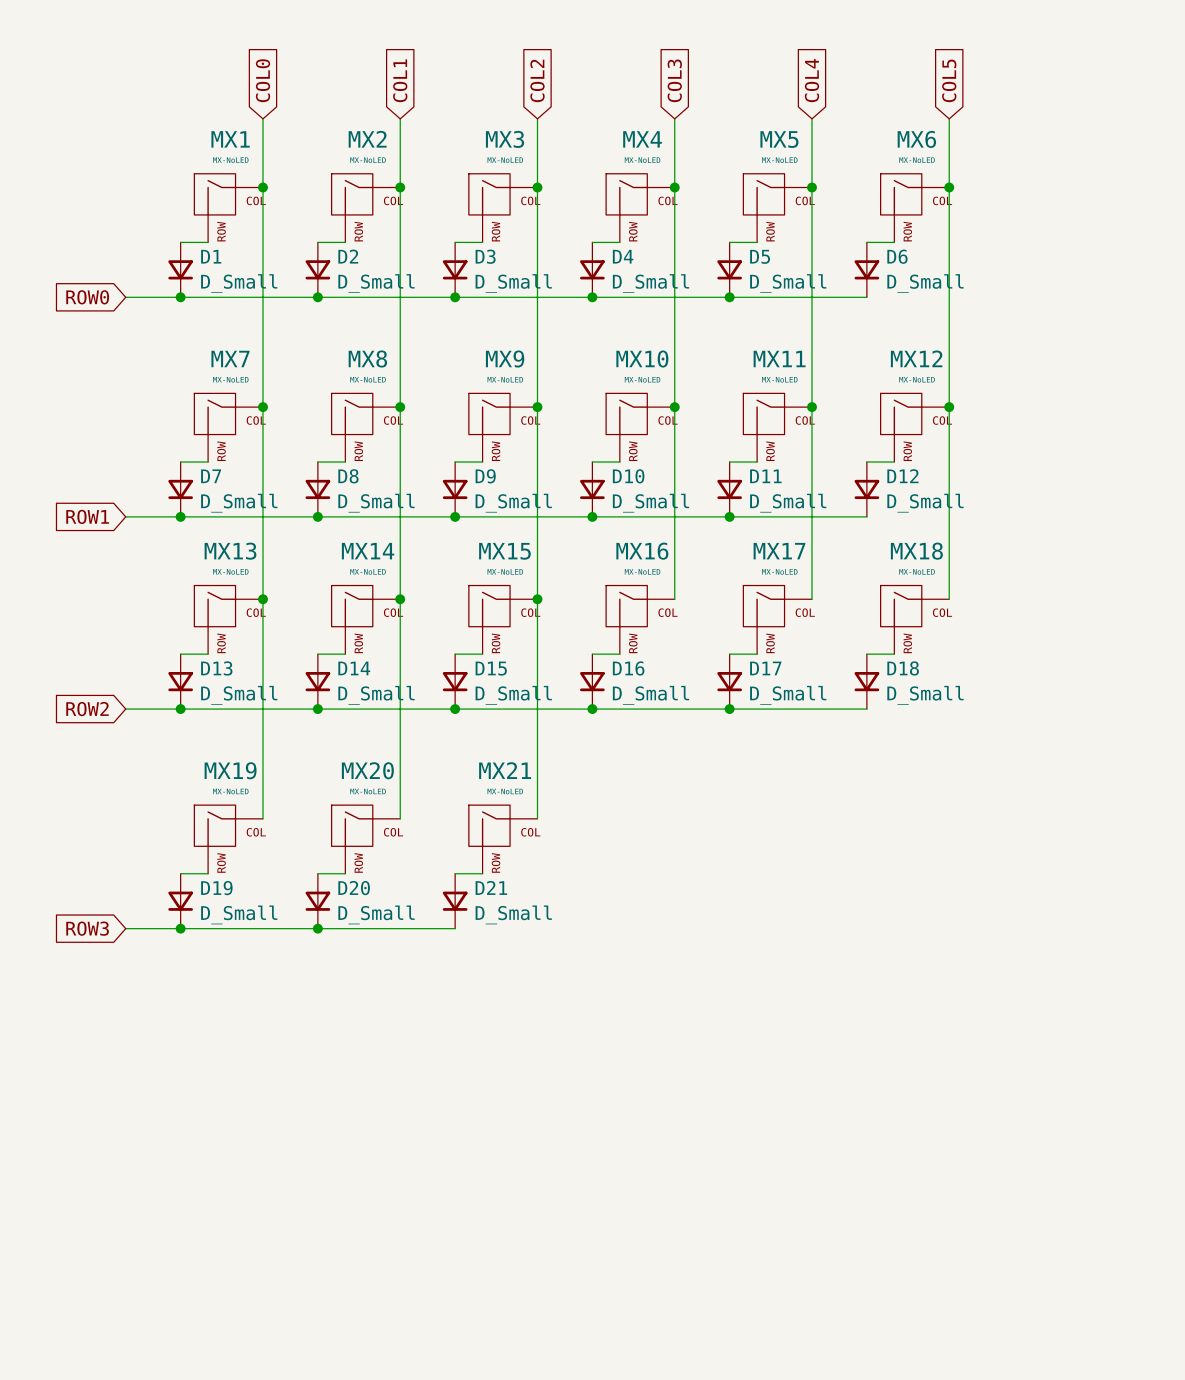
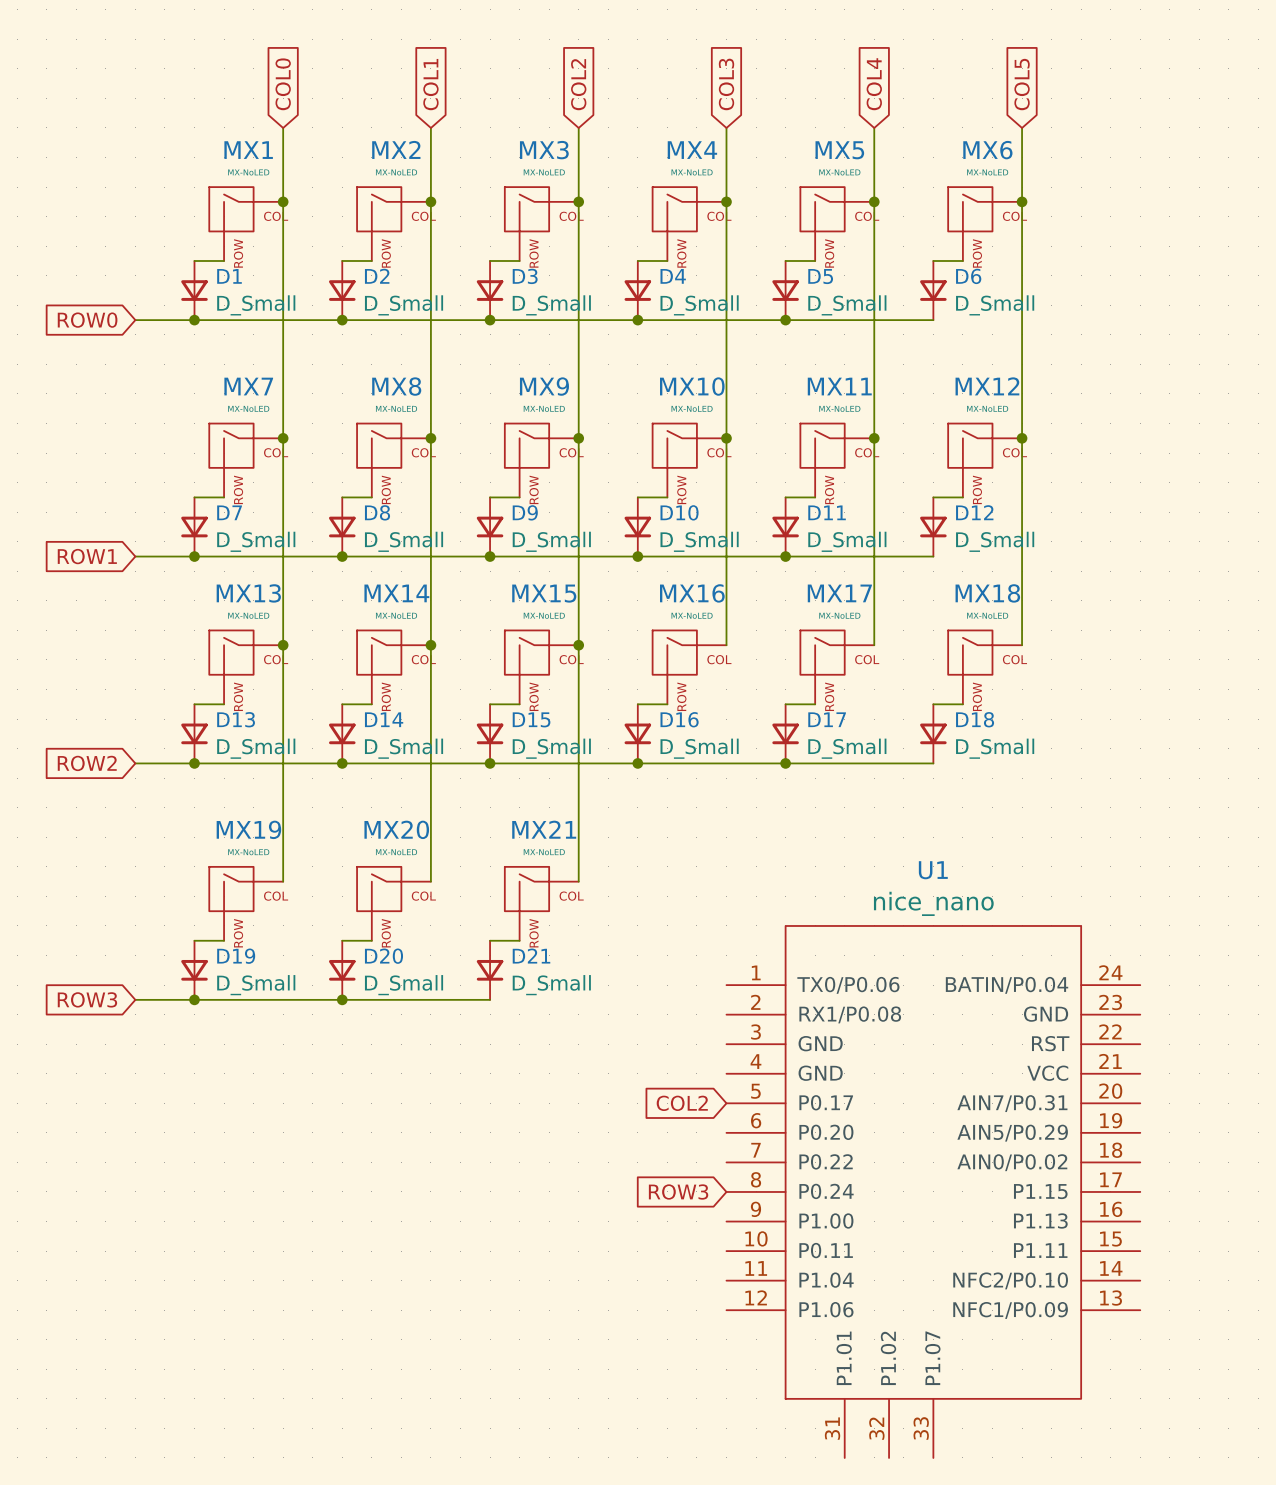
global label: none -> COL2 (682, 1103)
global label: none -> ROW3 (678, 1191)
U1: none -> nice_nano (933, 1191)

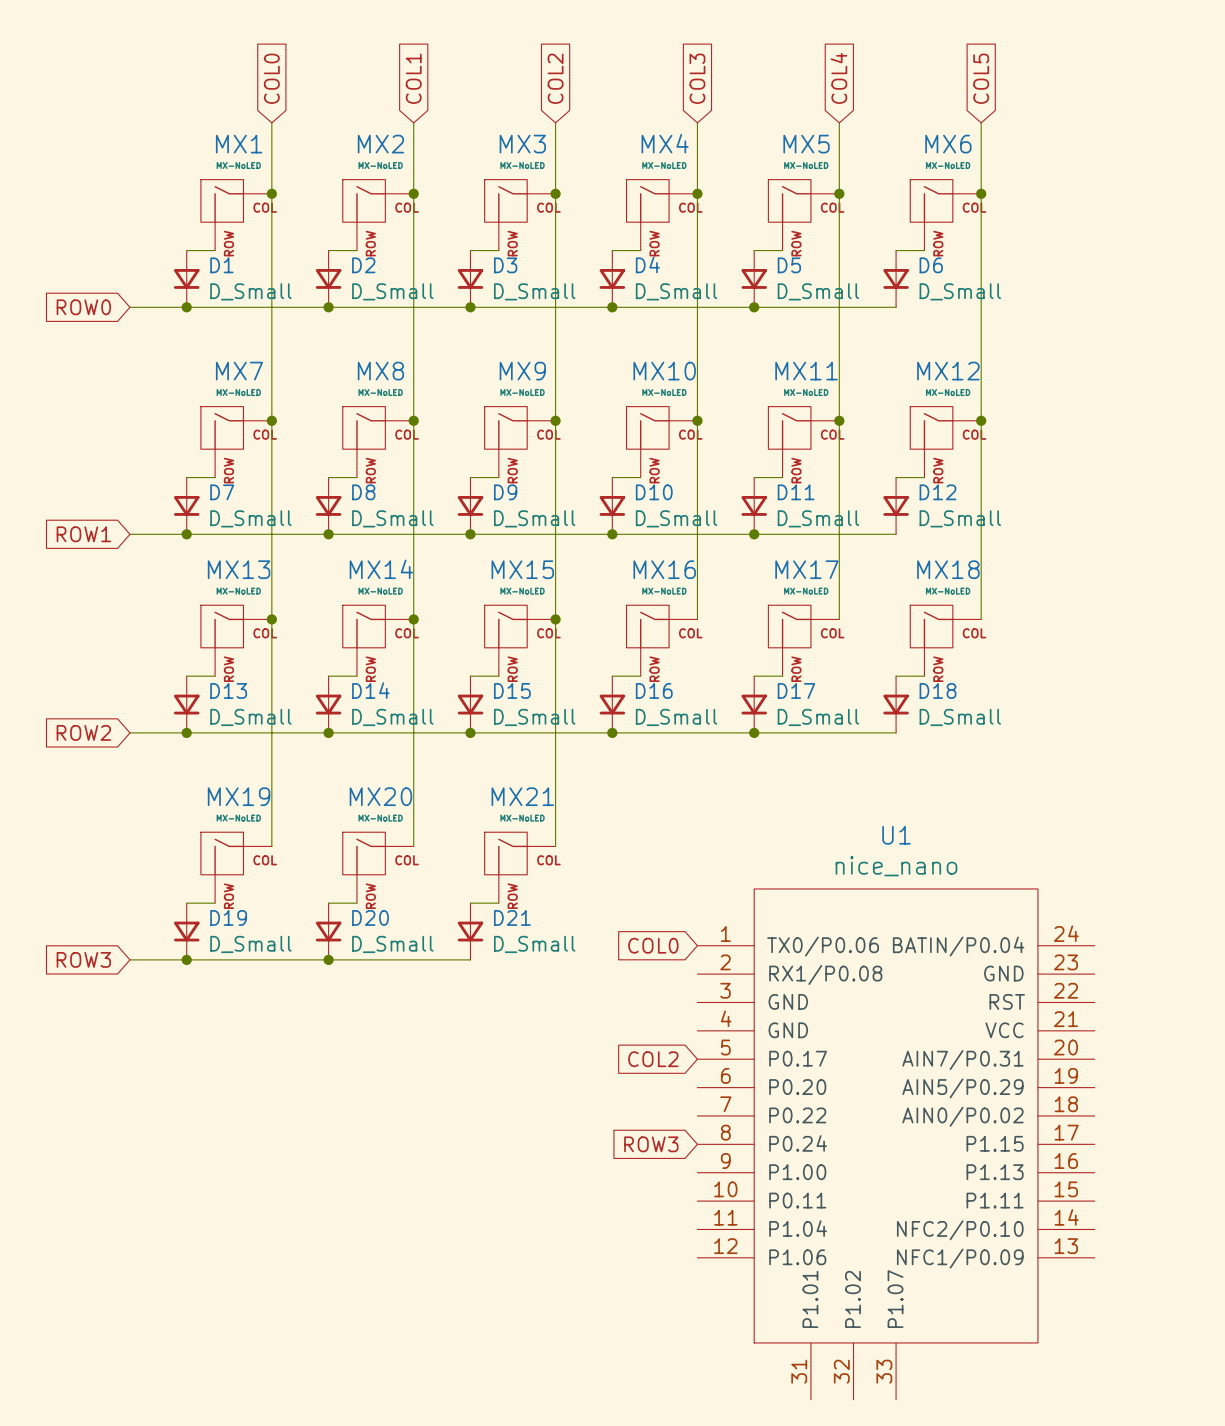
global label: none -> COL0 (653, 945)

